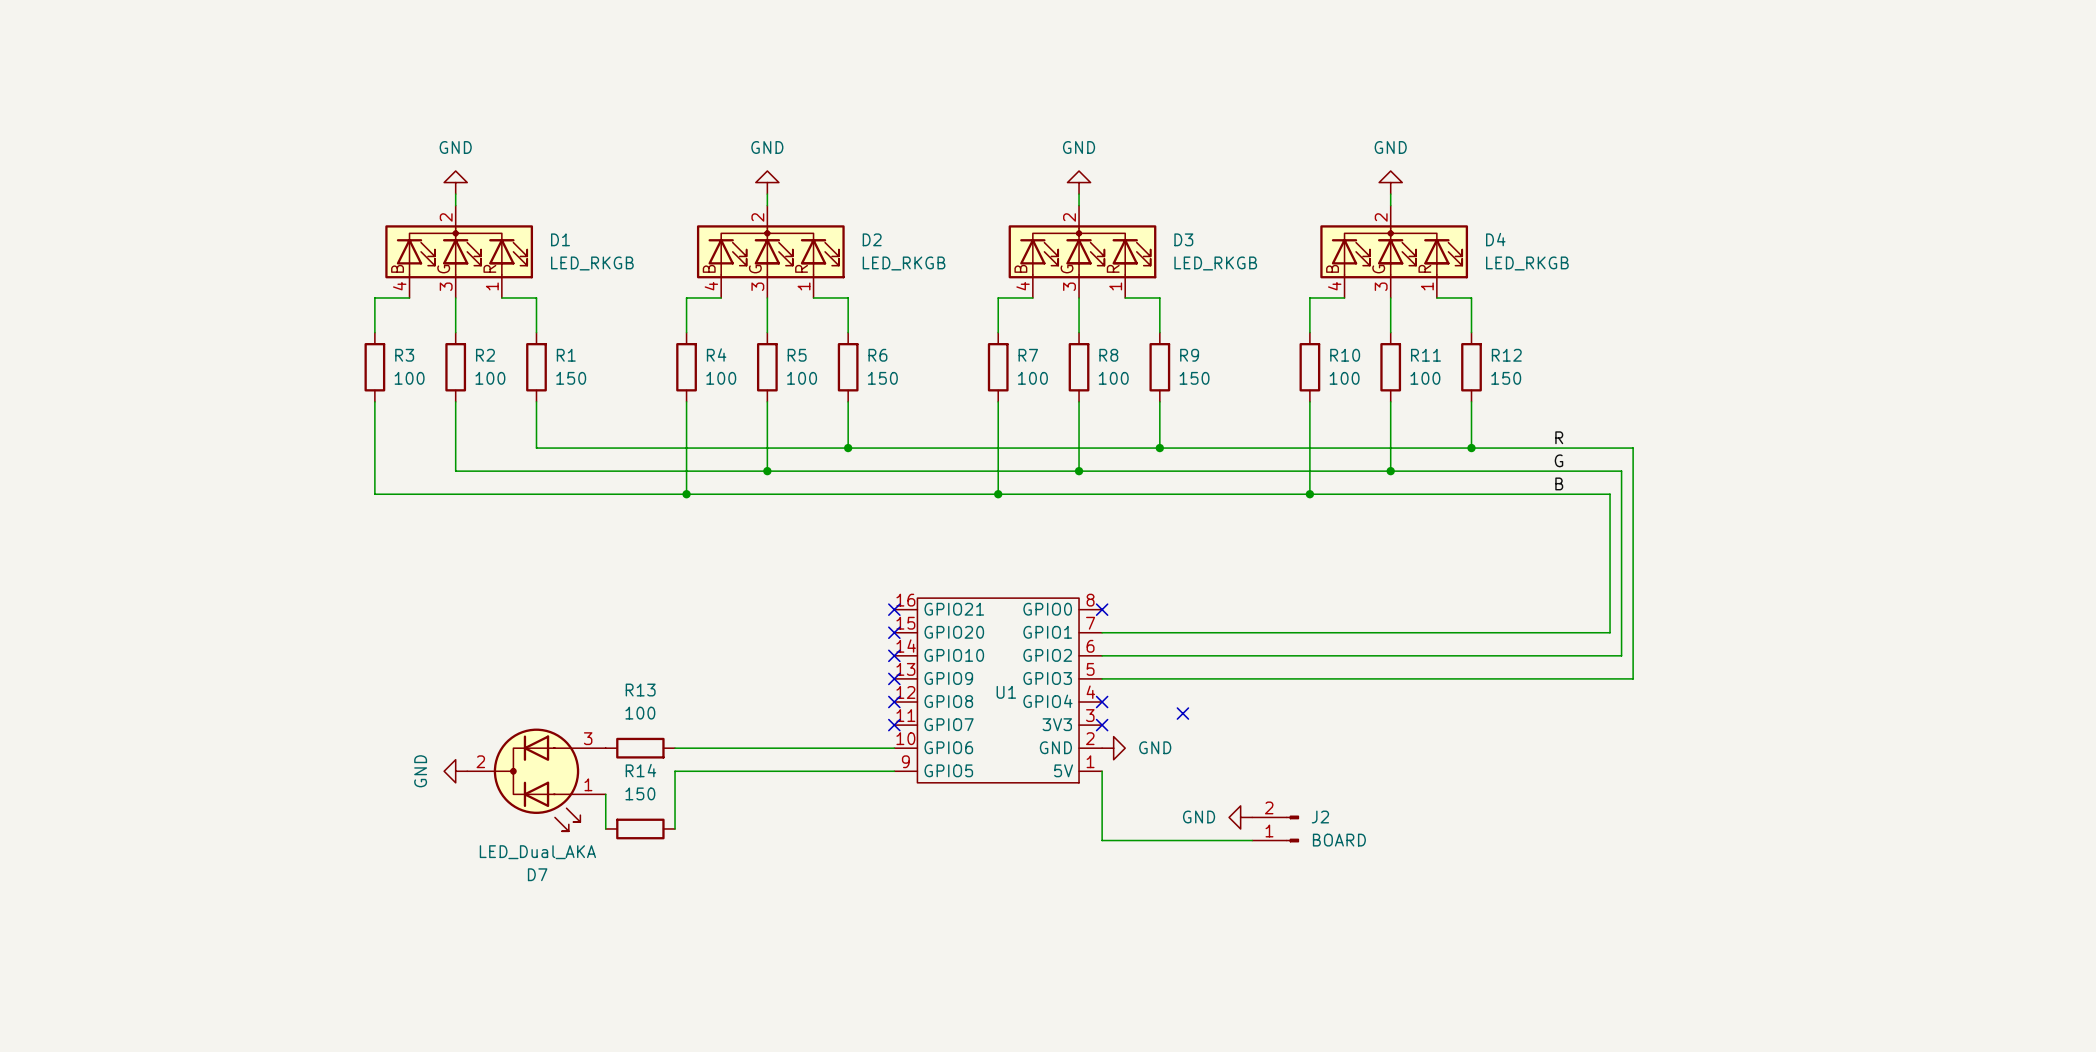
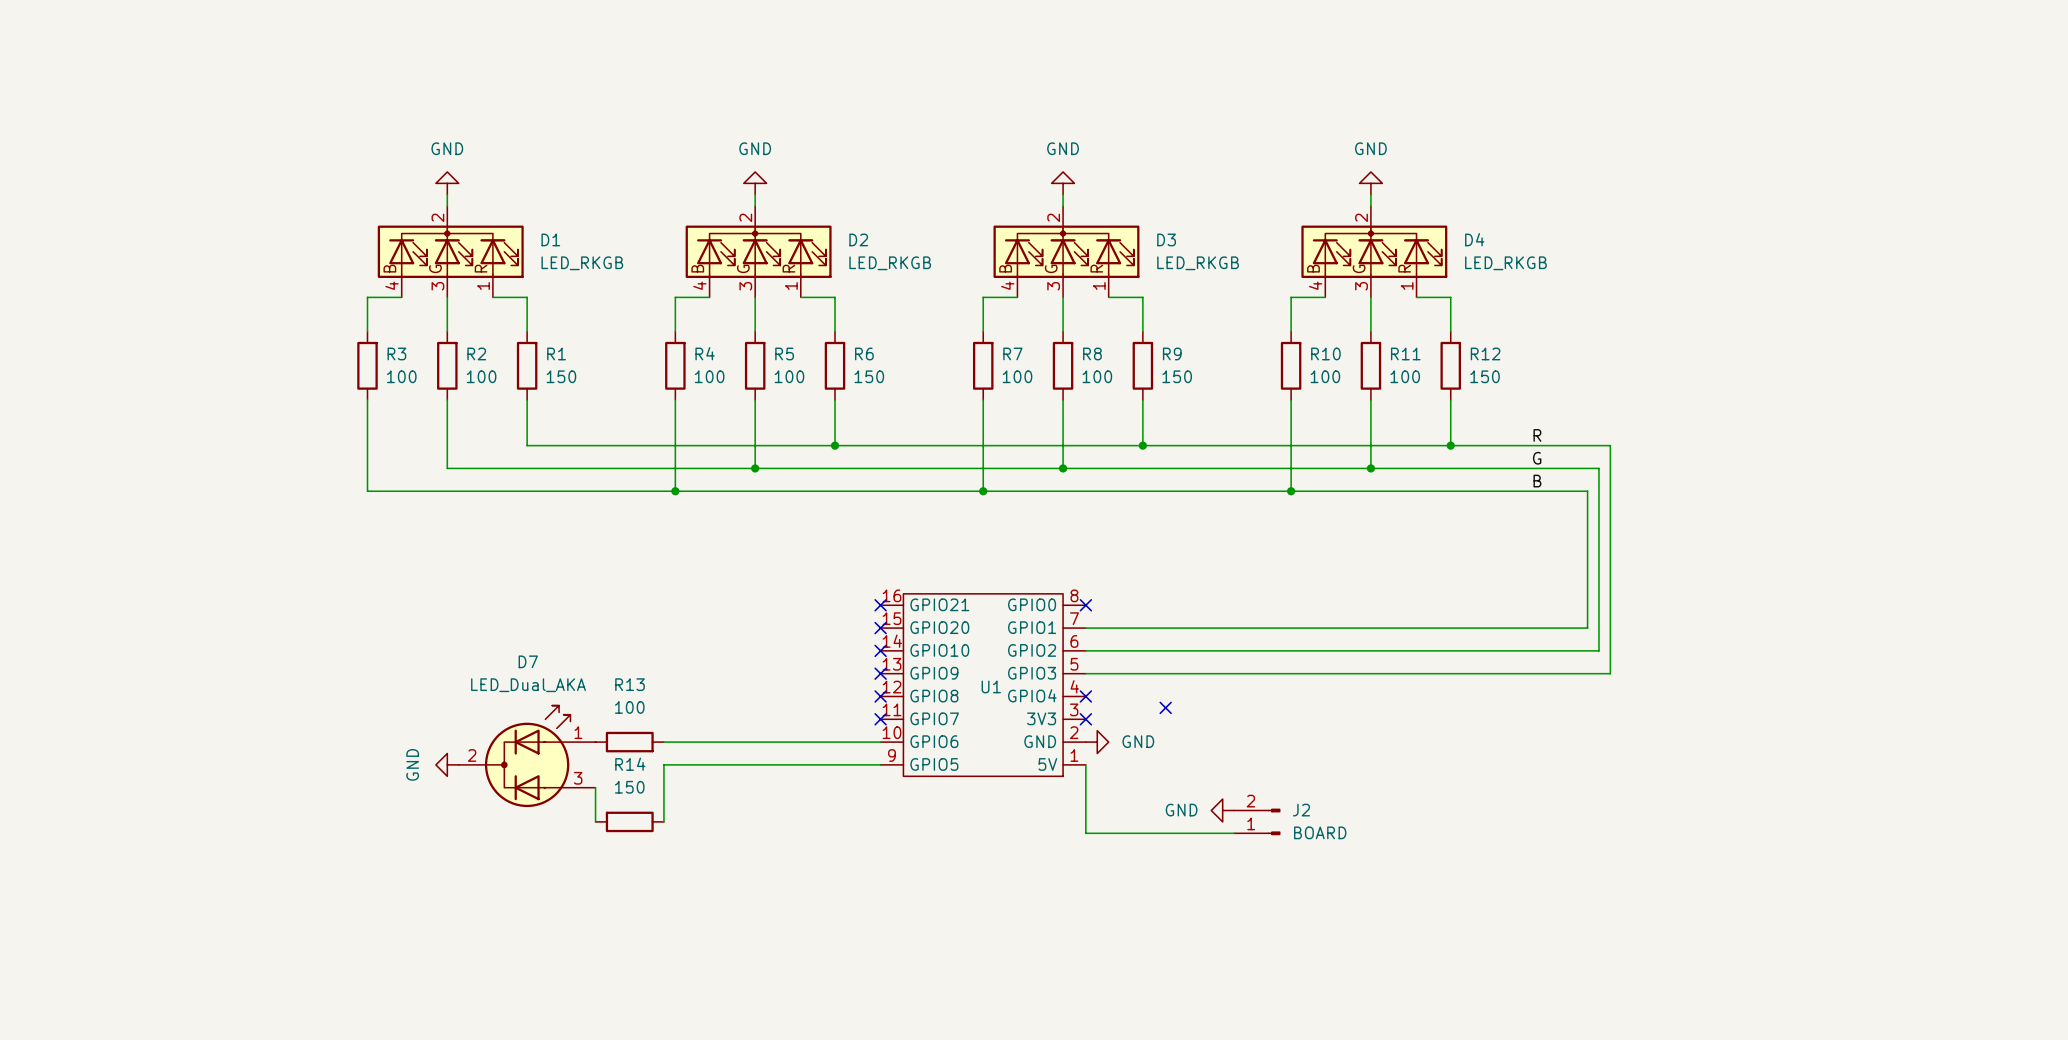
D7 flip: as is (537, 779) -> up-down (527, 756)

